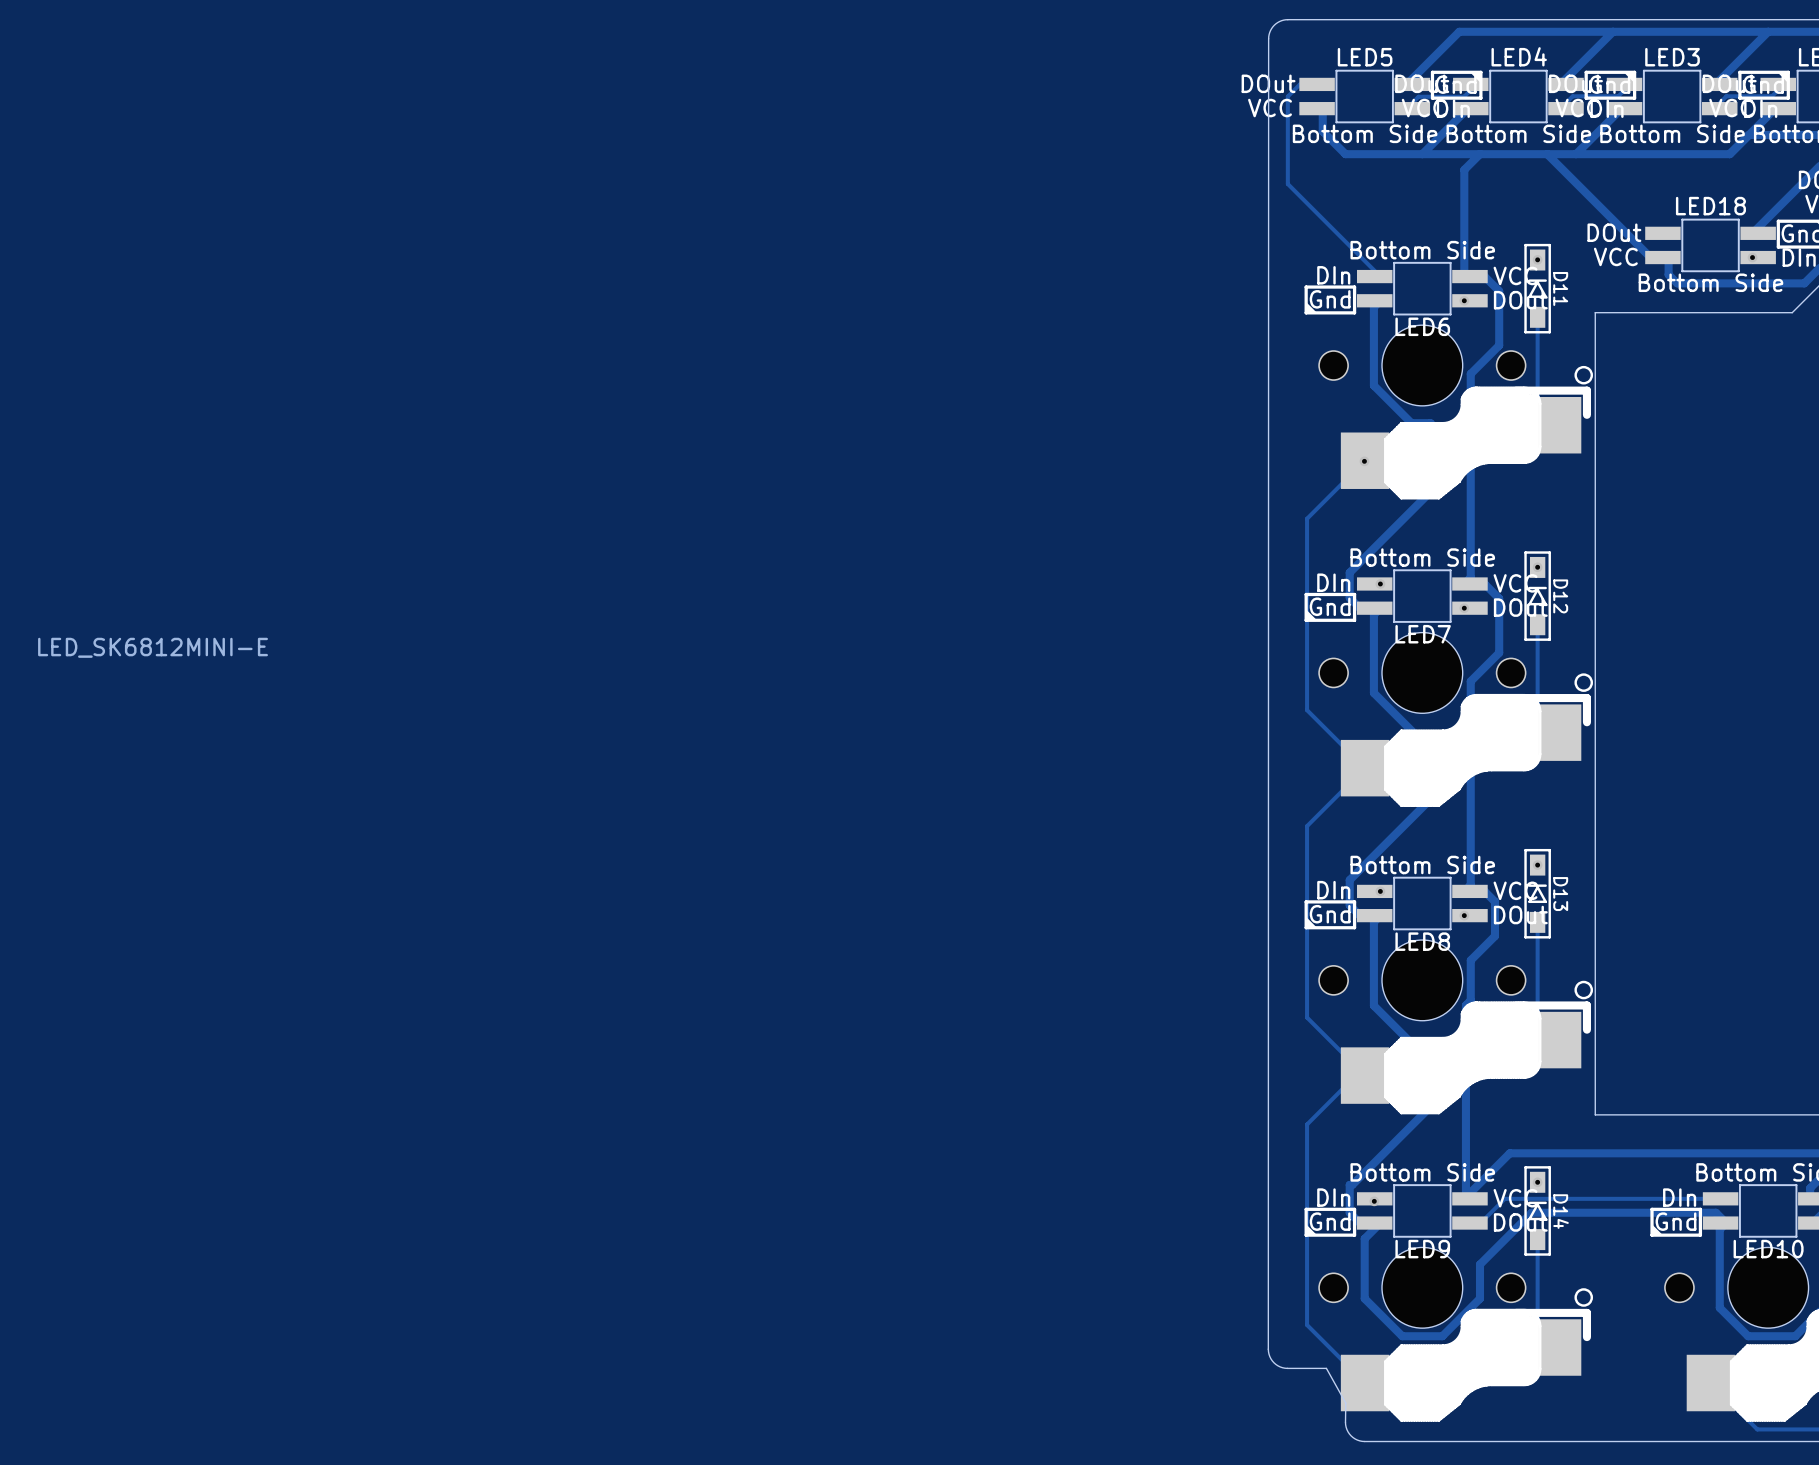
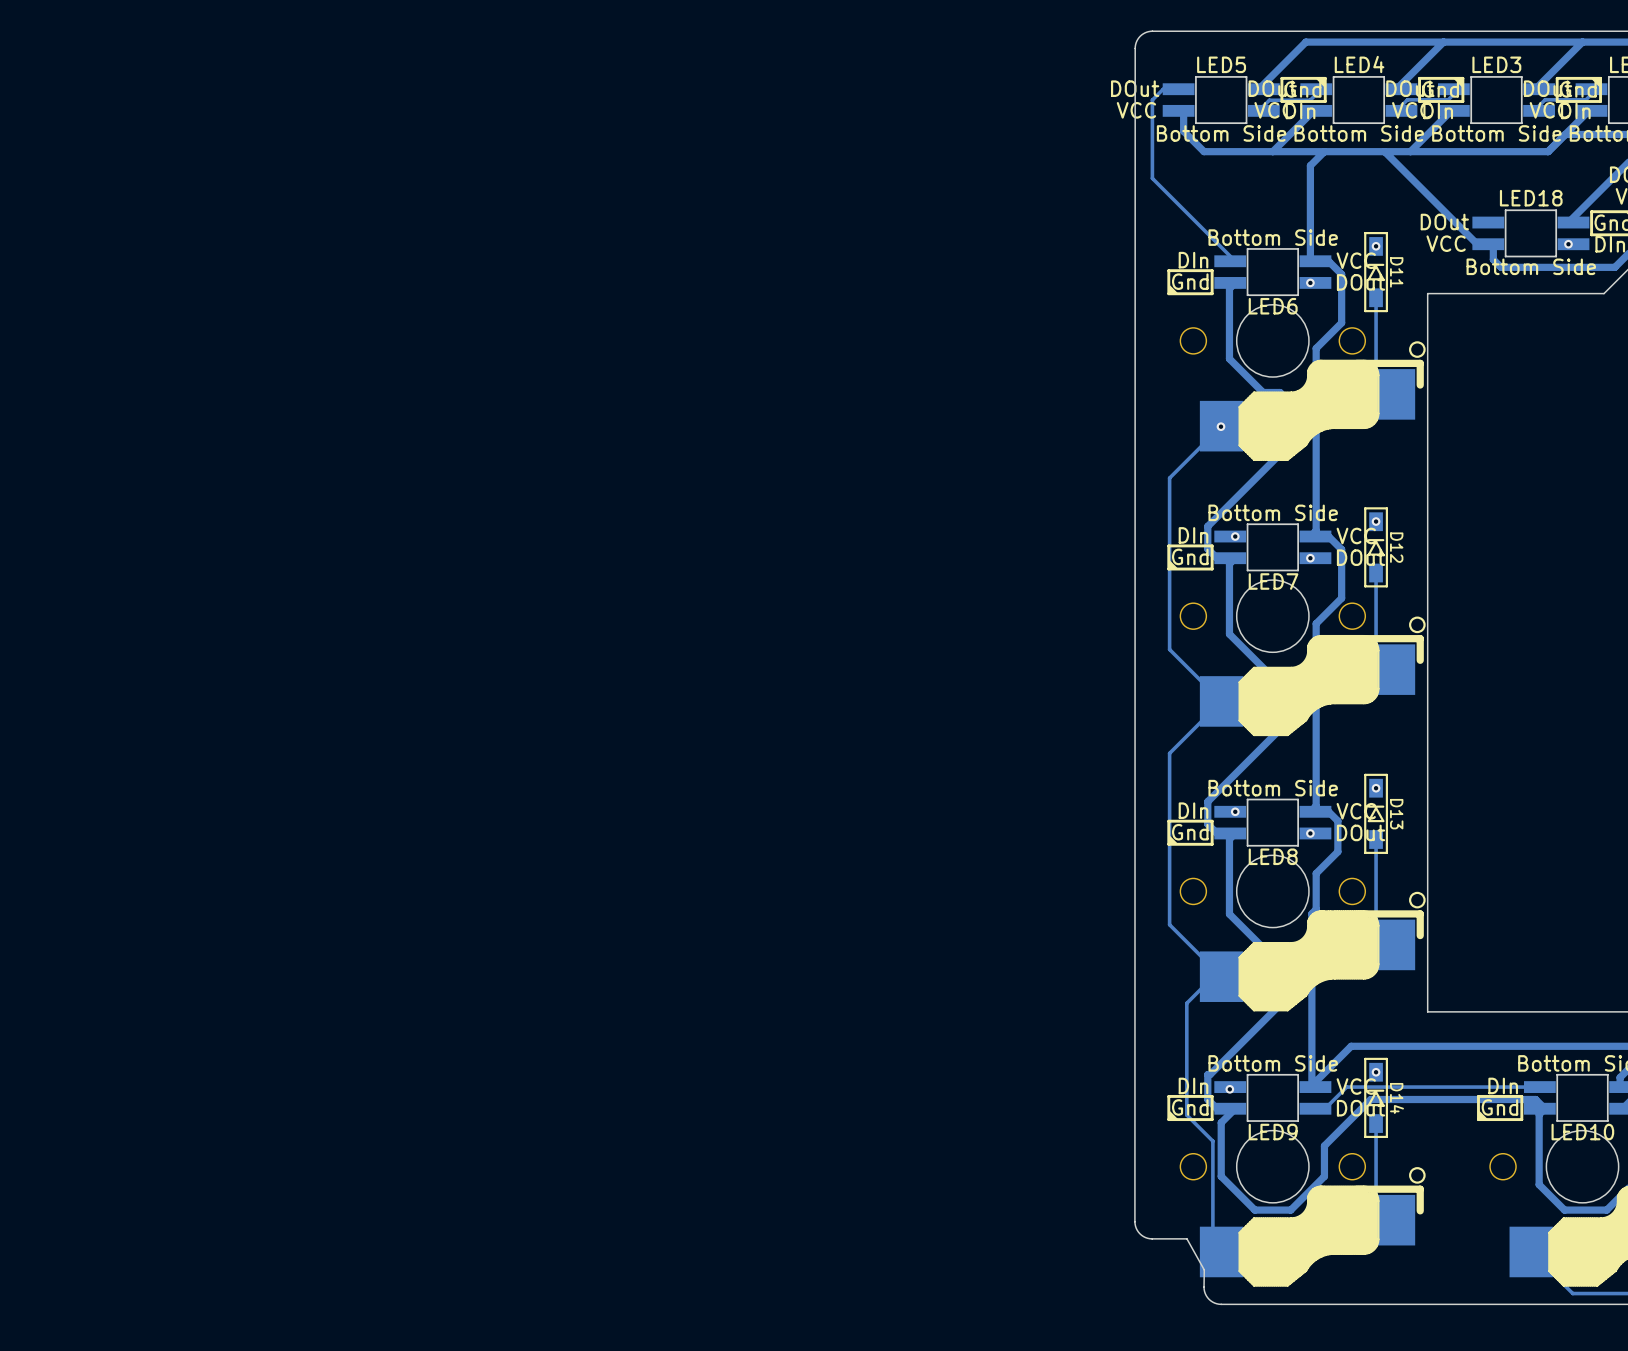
LED6 value: LED_SK6812MINI-E (153, 647) -> none
track: (1326, 1105) (1307, 1124) (1307, 1325) (1355, 1373) -> (1186, 1003) (1186, 1115) (1212, 1141) (1212, 1243)

